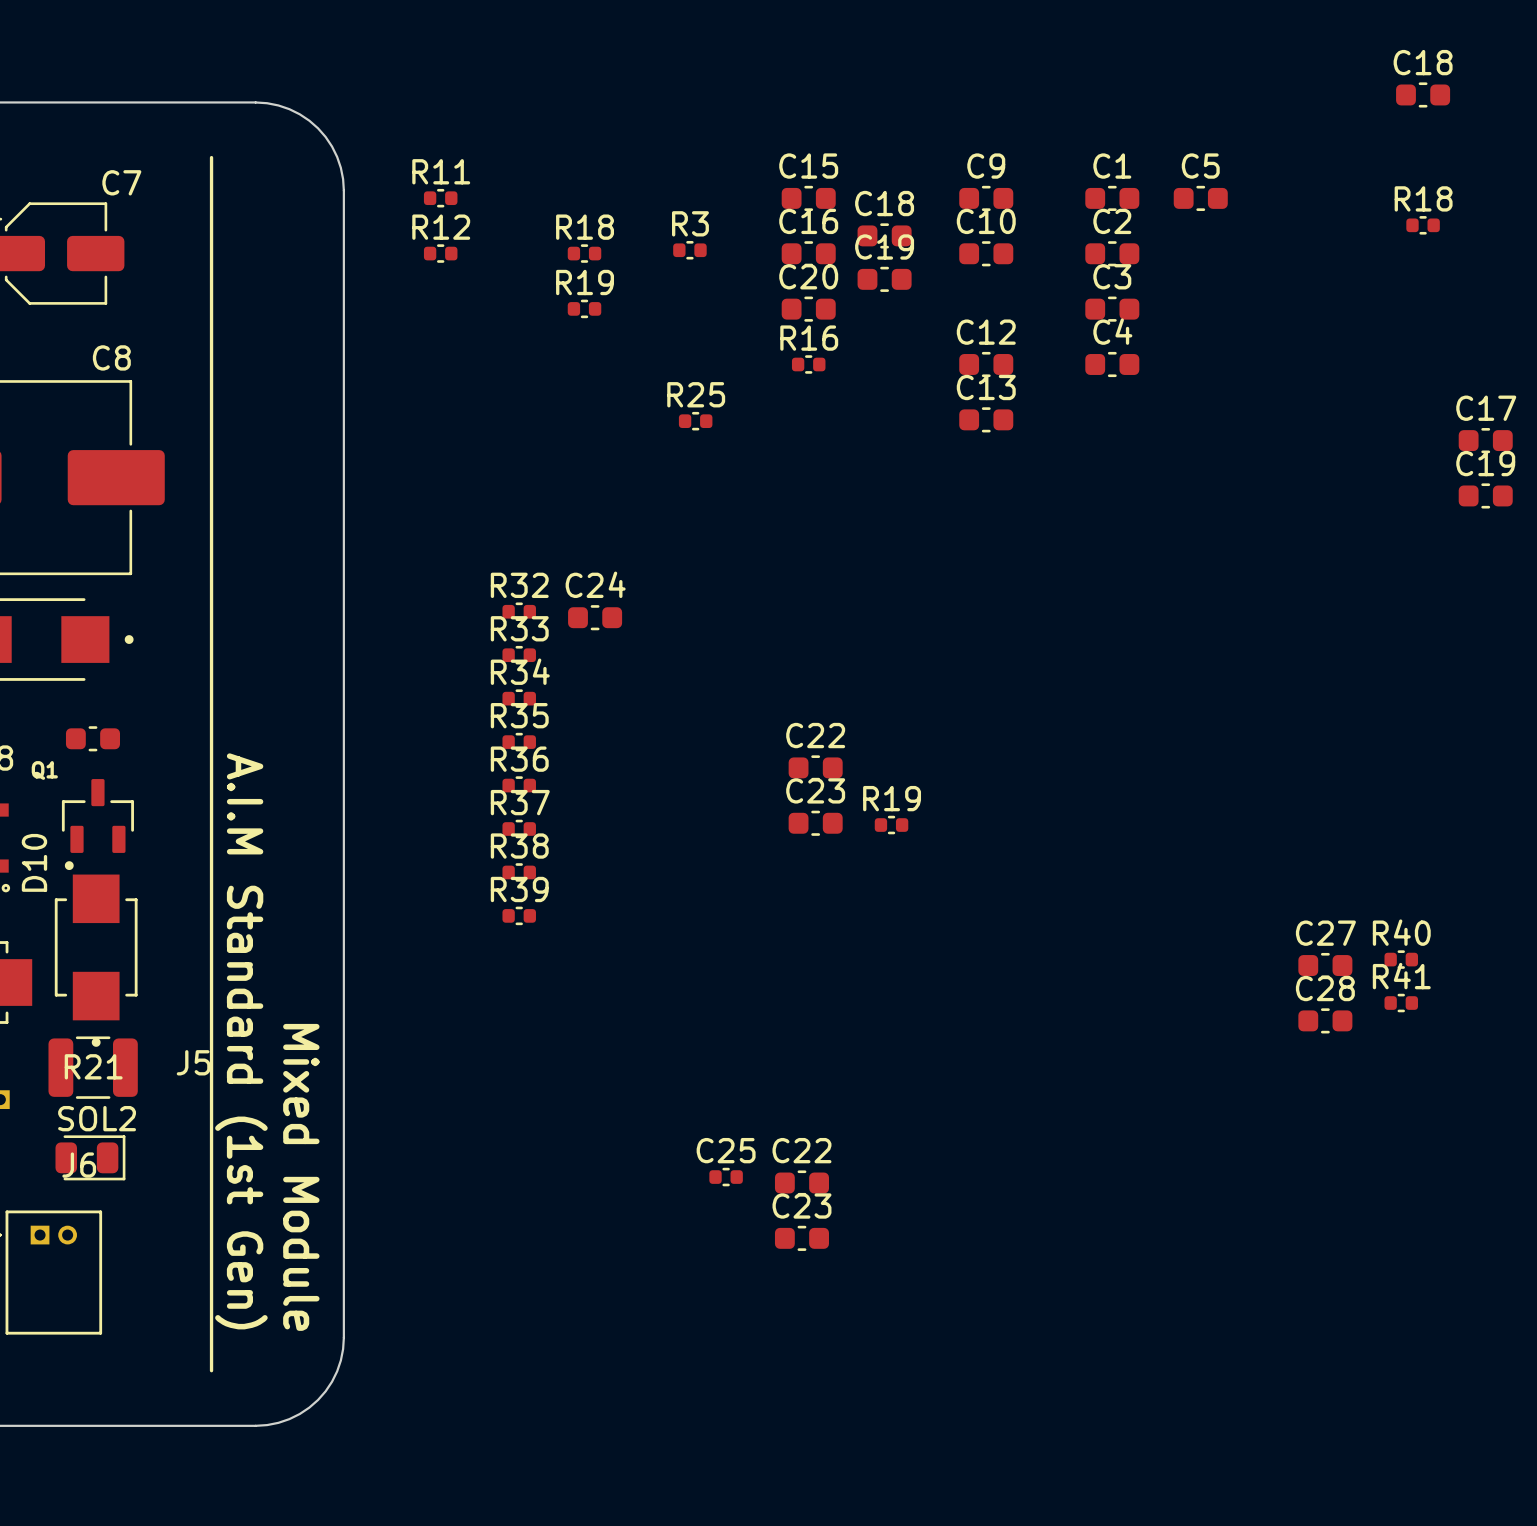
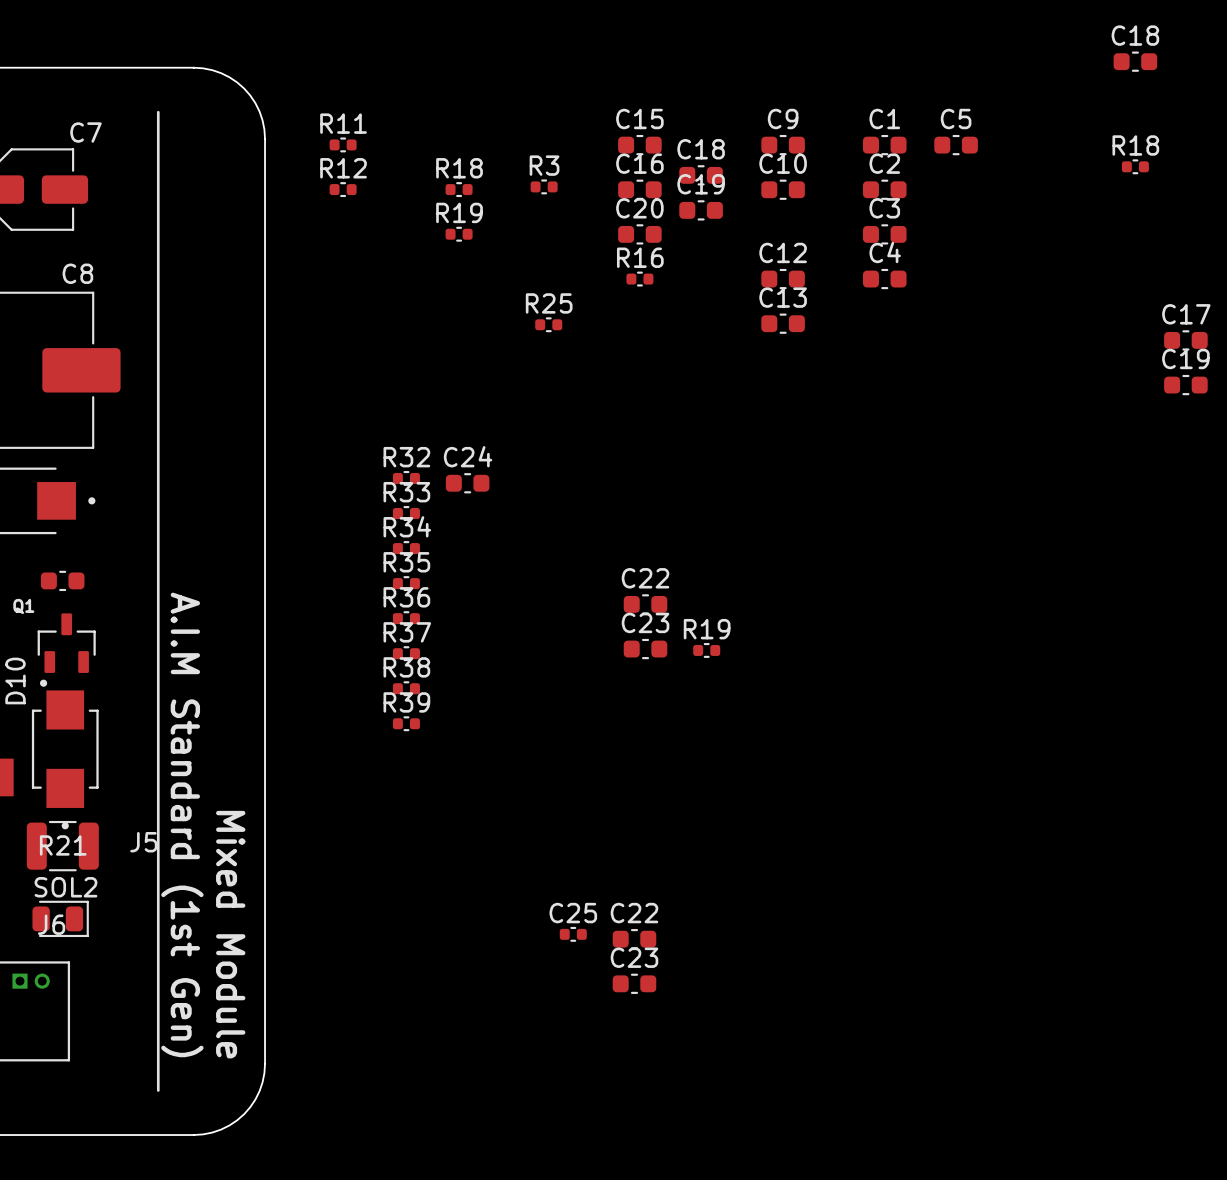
R40: (1401, 959) -> none
C27: (1325, 965) -> none
R41: (1401, 1003) -> none
C28: (1325, 1020) -> none

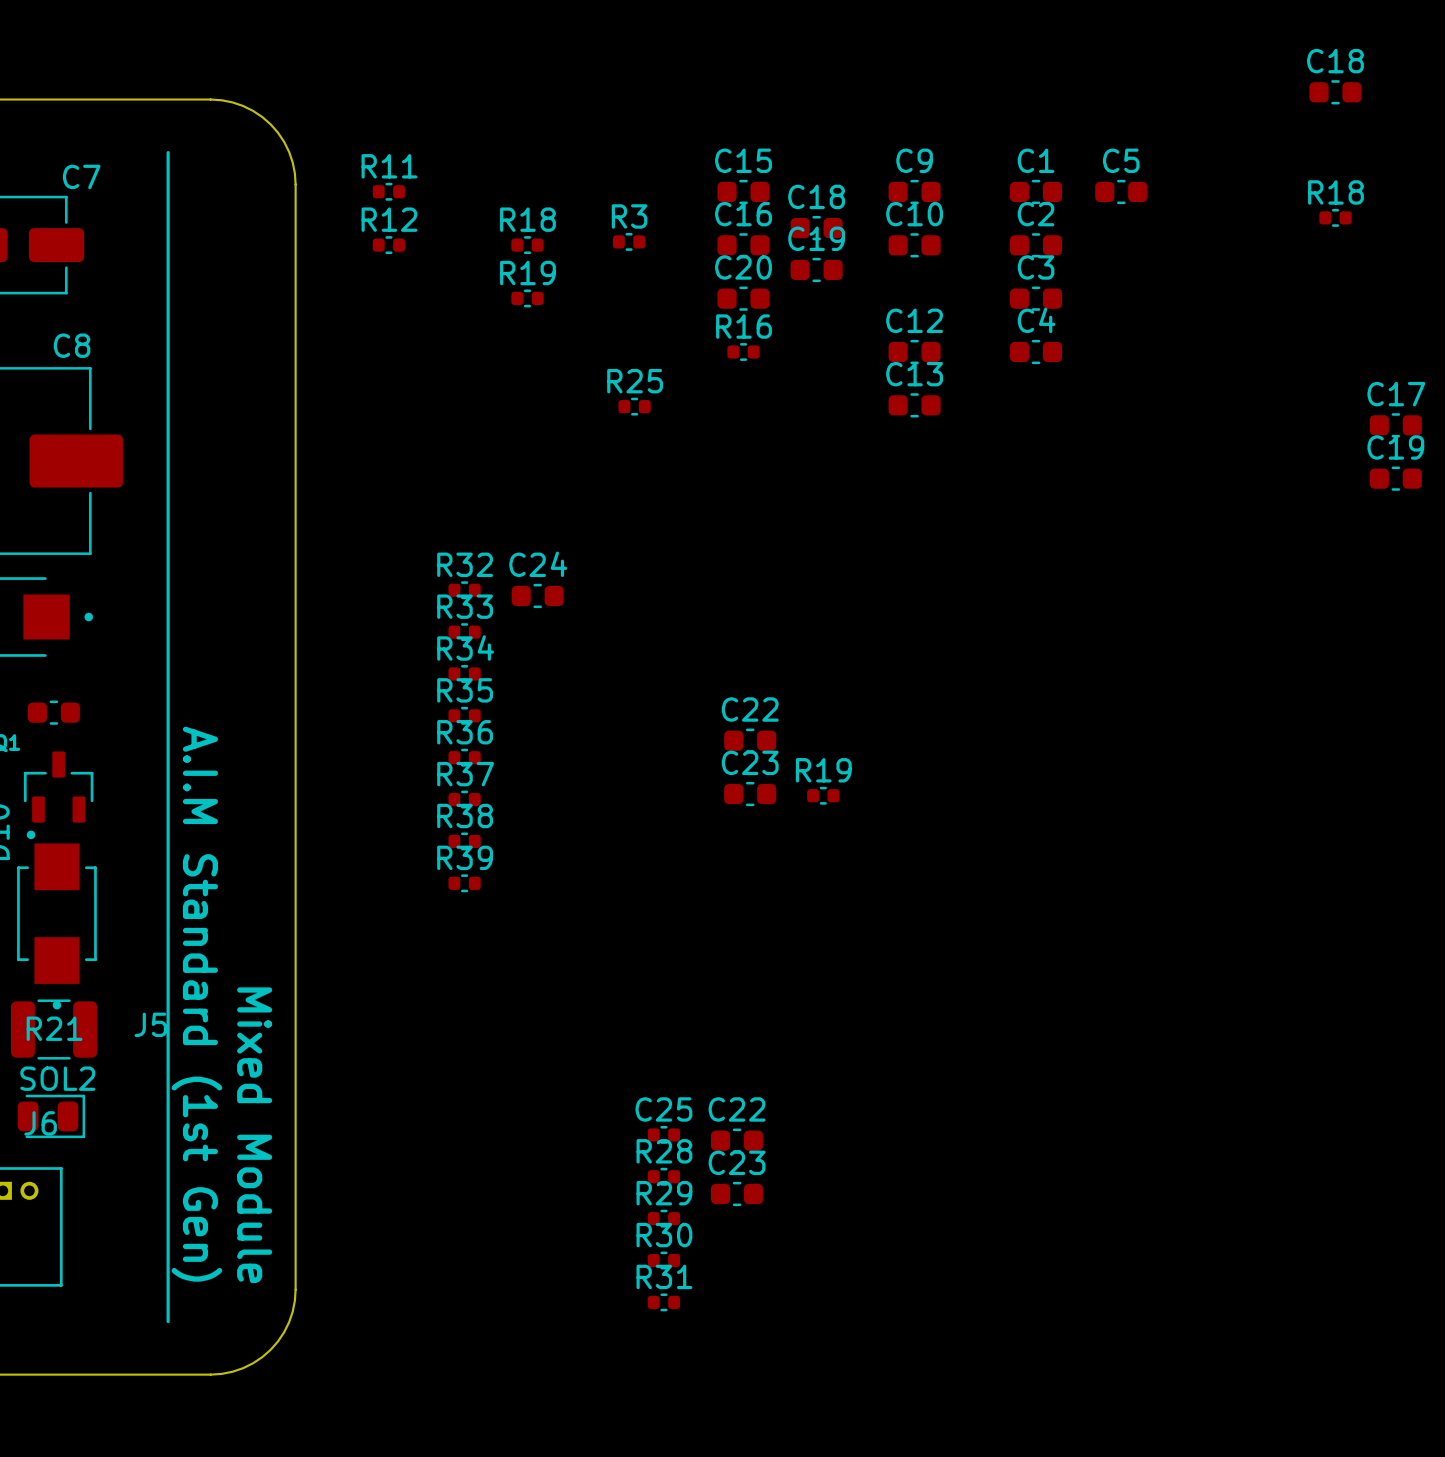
R28: none -> (663, 1176)
R29: none -> (663, 1218)
R30: none -> (663, 1260)
R31: none -> (663, 1302)

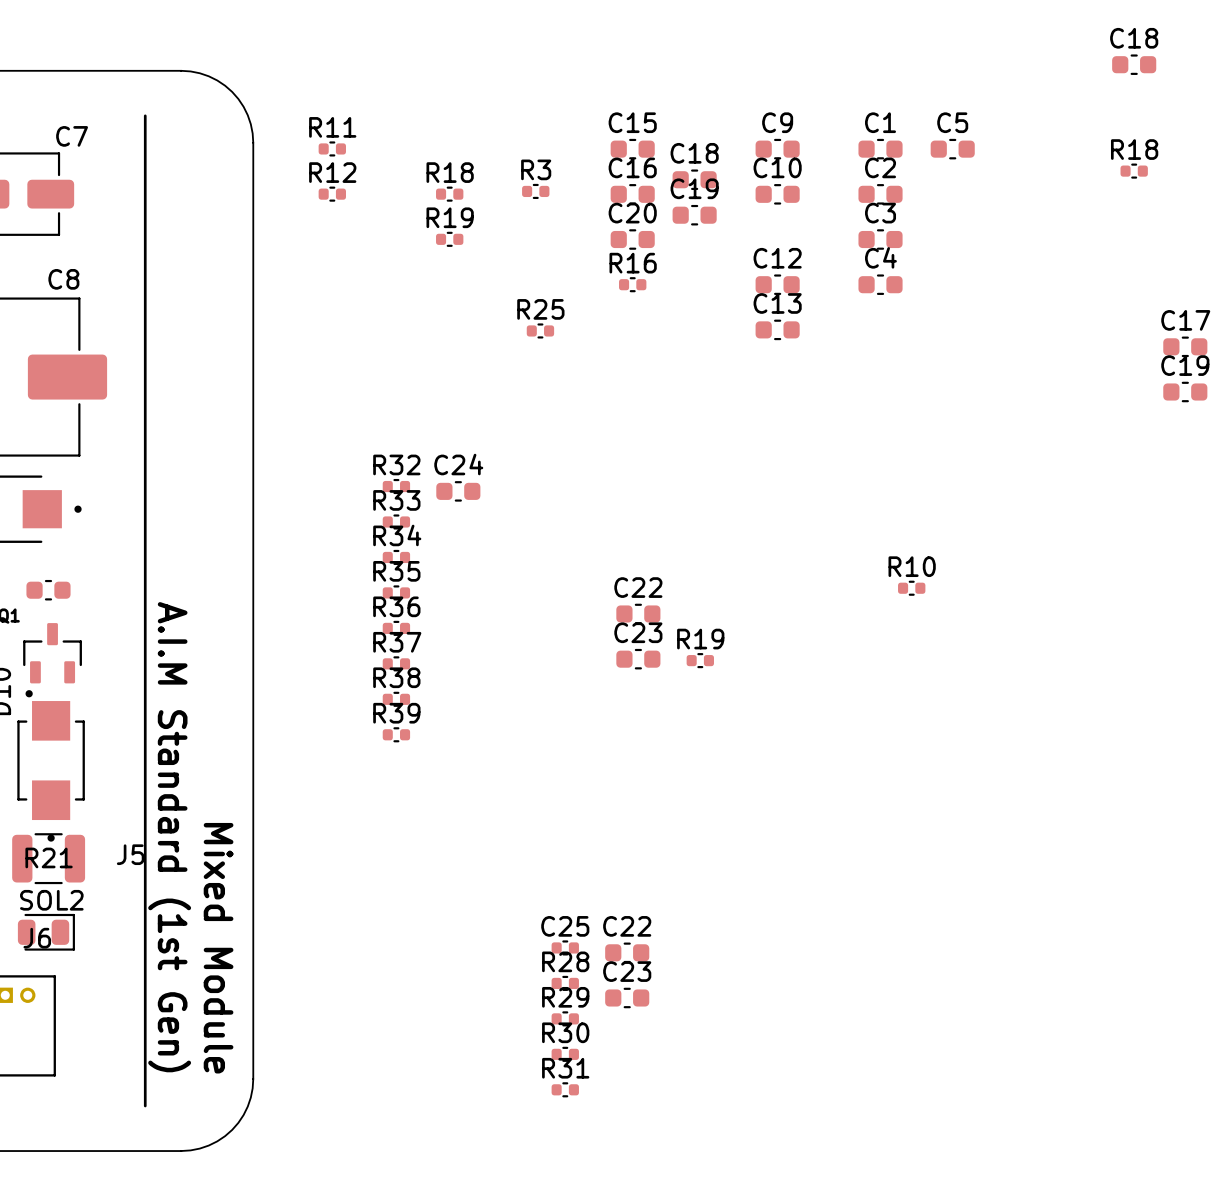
R10: none -> (911, 588)

